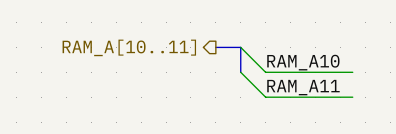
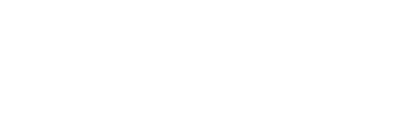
hierarchical label: RAM_A[10..11] (129, 47) -> none
bus: (215, 47) (240, 47) (240, 72) -> none
wire: (240, 47) (265, 72) (352, 72) -> none
label: RAM_A10 (303, 62) -> none
wire: (240, 72) (265, 97) (352, 97) -> none
label: RAM_A11 (303, 87) -> none

